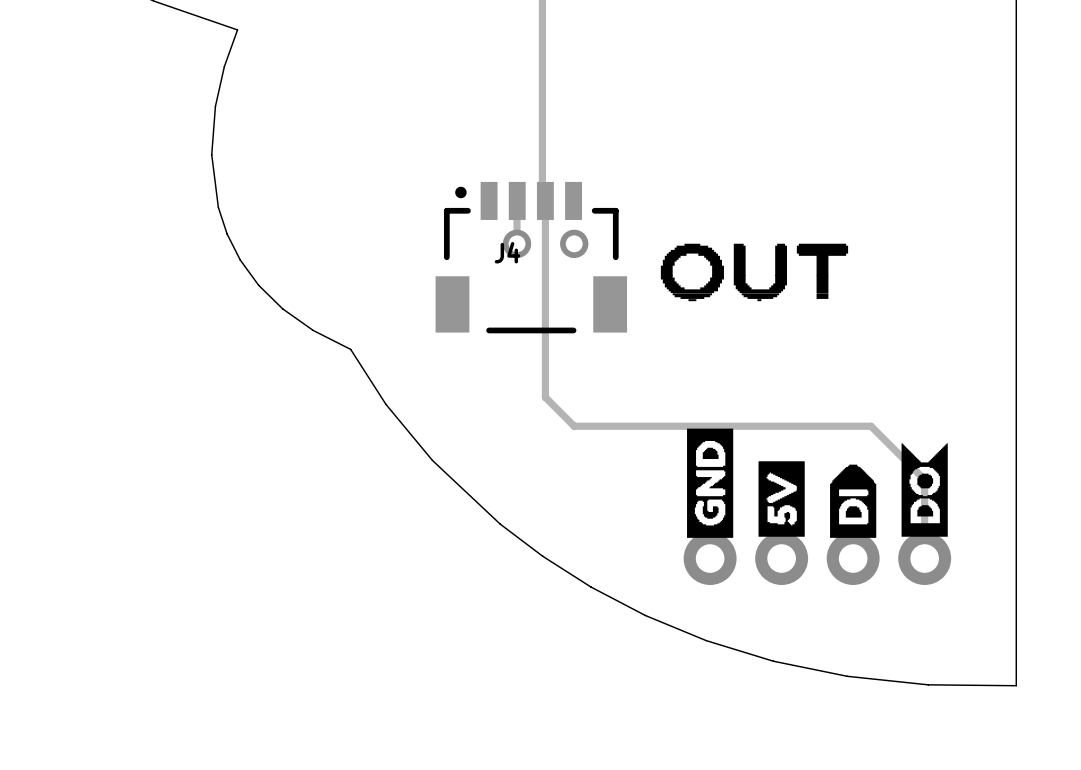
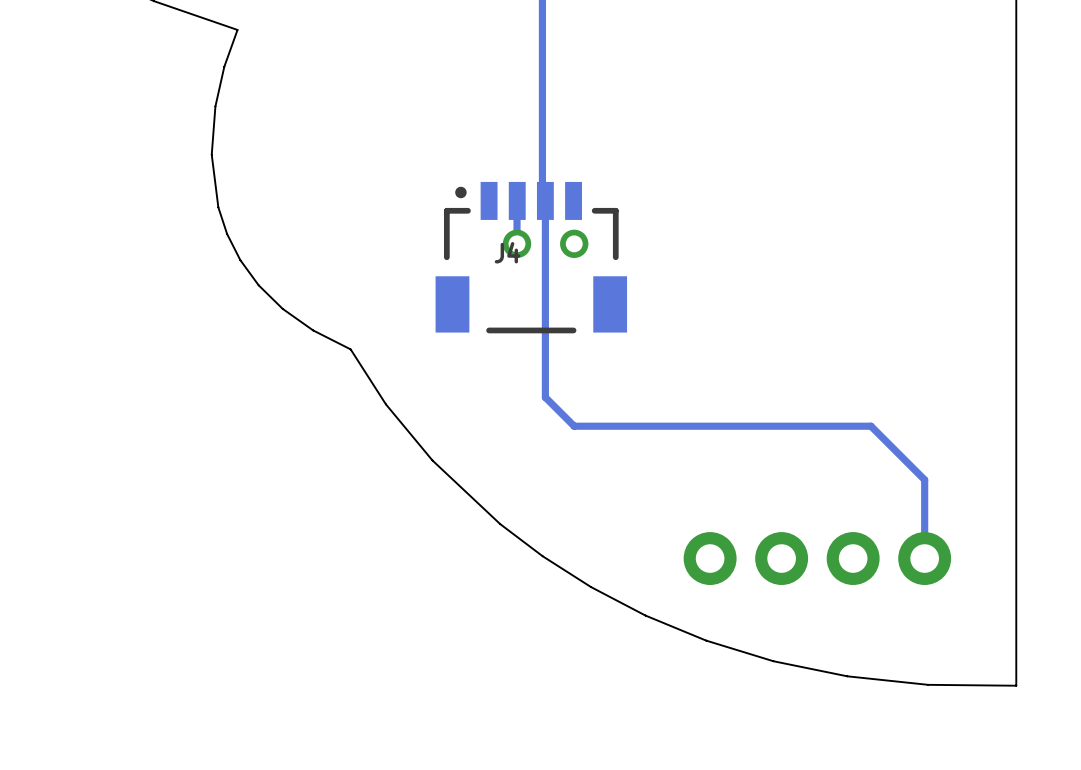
drawing: [660, 243, 849, 302] -> none
drawing: [687, 428, 948, 538] -> none

